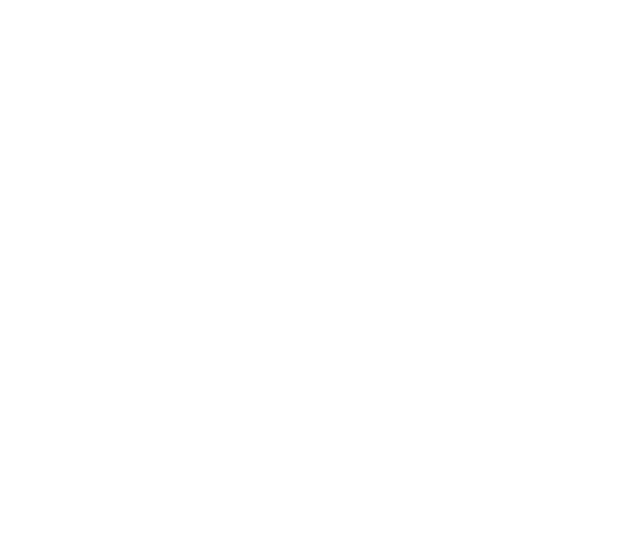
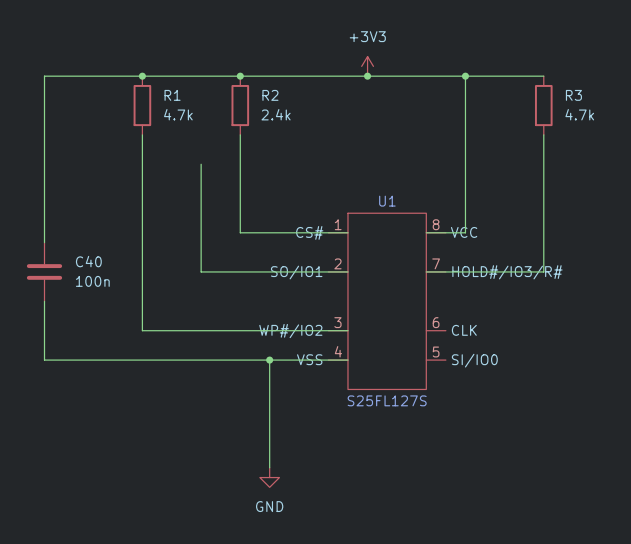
power symbol: none -> +3V3 (367, 66)
junction: none -> (142, 76)
junction: none -> (240, 76)
junction: none -> (367, 76)
wire: none -> (465, 76) (465, 232) (426, 232)
junction: none -> (465, 76)
wire: none -> (543, 76) (44, 76) (44, 242)
R1: none -> 4.7k (142, 105)
R2: none -> 2.4k (240, 105)
R3: none -> 4.7k (543, 105)
wire: none -> (142, 134) (142, 330) (347, 330)
wire: none -> (240, 134) (240, 232) (347, 232)
wire: none -> (543, 134) (543, 271) (426, 271)
wire: none -> (201, 164) (201, 271) (347, 271)
text: none -> U1 (387, 201)
C40: none -> 100n (44, 271)
wire: none -> (44, 301) (44, 360) (347, 360)
part: none -> (387, 301)
wire: none -> (269, 360) (269, 467)
junction: none -> (269, 360)
text: none -> S25FL127S (387, 400)
power symbol: none -> GND (269, 477)

